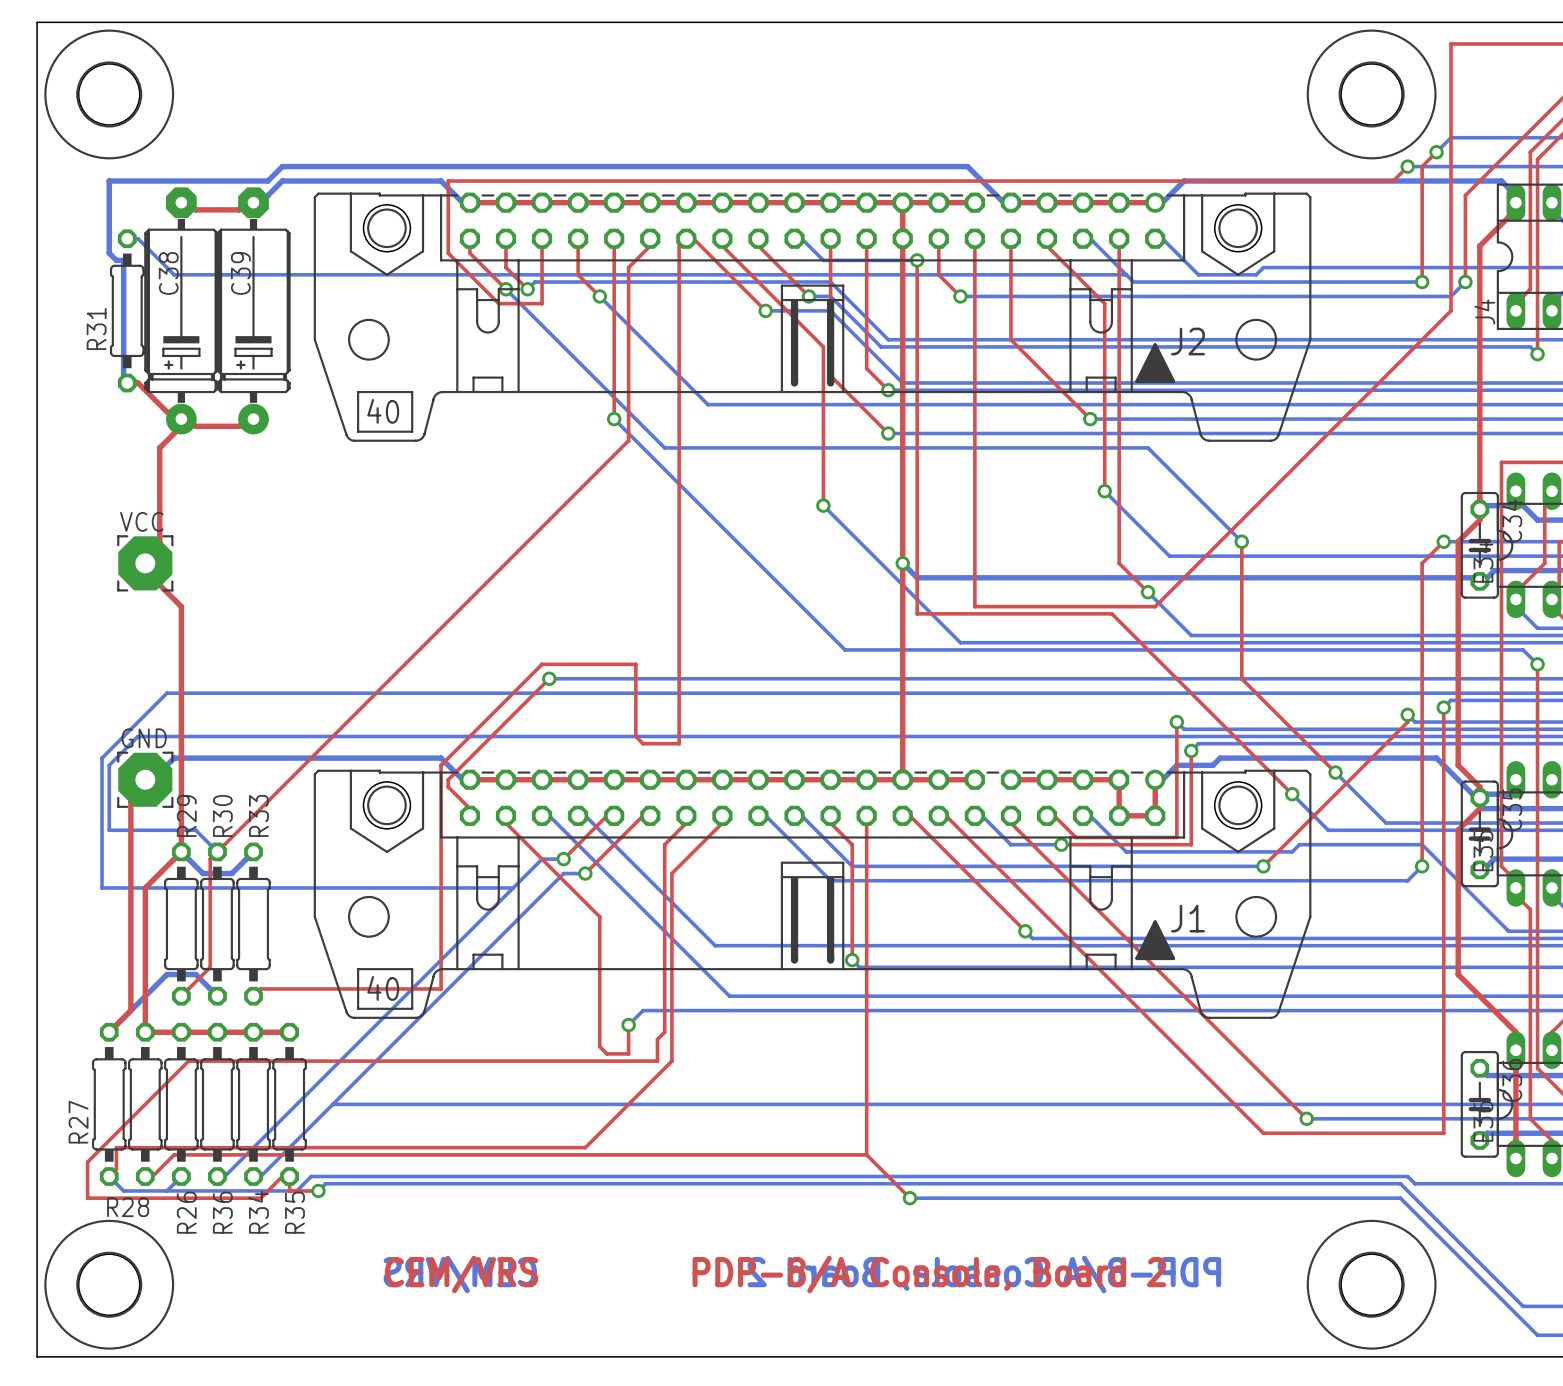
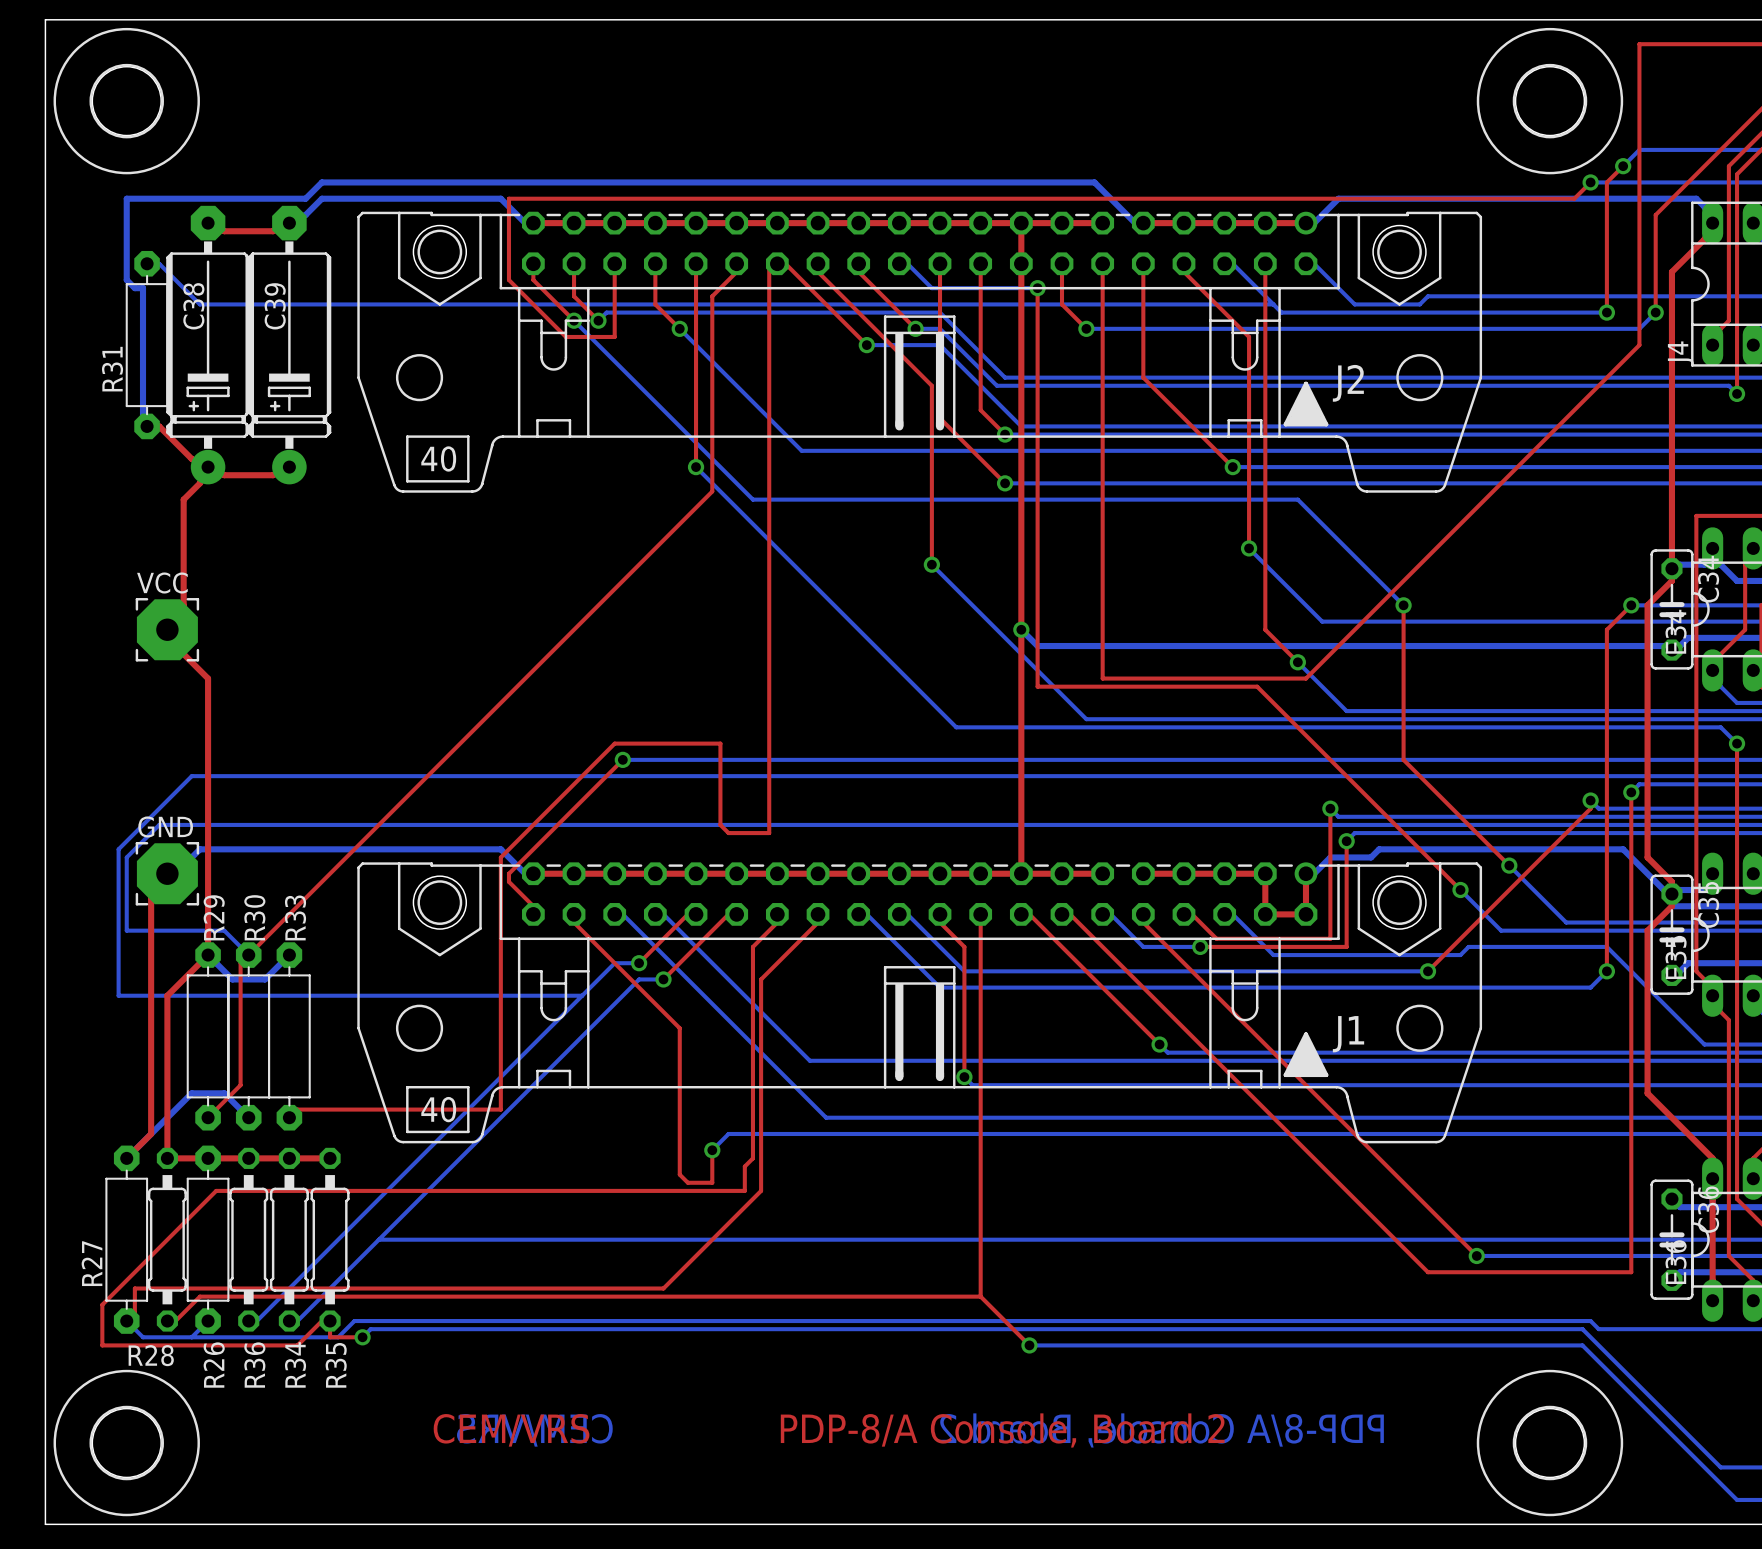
R31 footprint: [109, 229, 145, 393] -> [125, 250, 169, 440]
R29 footprint: [164, 842, 199, 1006] -> [186, 942, 230, 1131]
R30 footprint: [200, 842, 235, 1006] -> [227, 942, 271, 1131]
R33 footprint: [236, 842, 271, 1006] -> [268, 942, 311, 1131]
R27 footprint: [91, 1022, 127, 1186] -> [105, 1145, 149, 1334]
R26 footprint: [164, 1022, 199, 1186] -> [186, 1145, 230, 1334]

